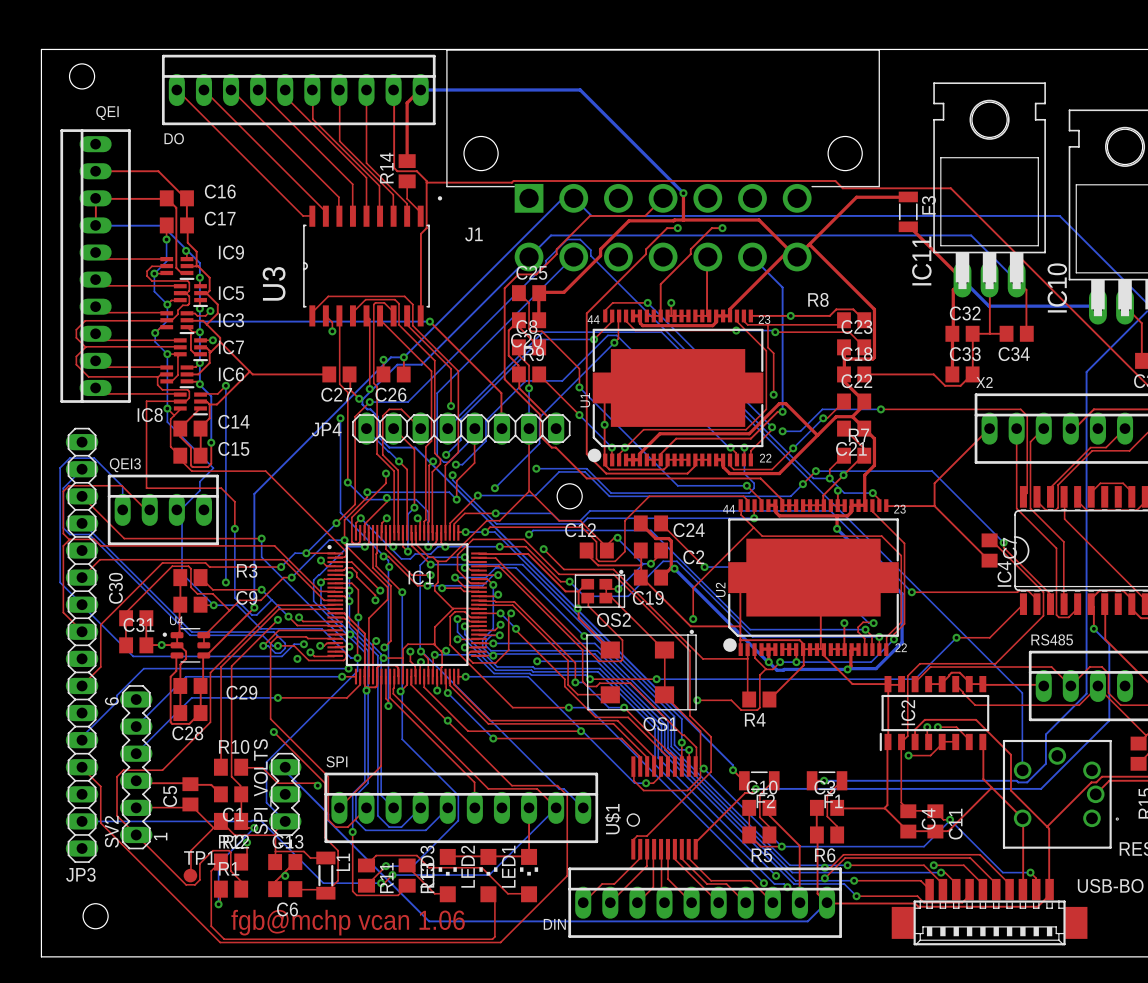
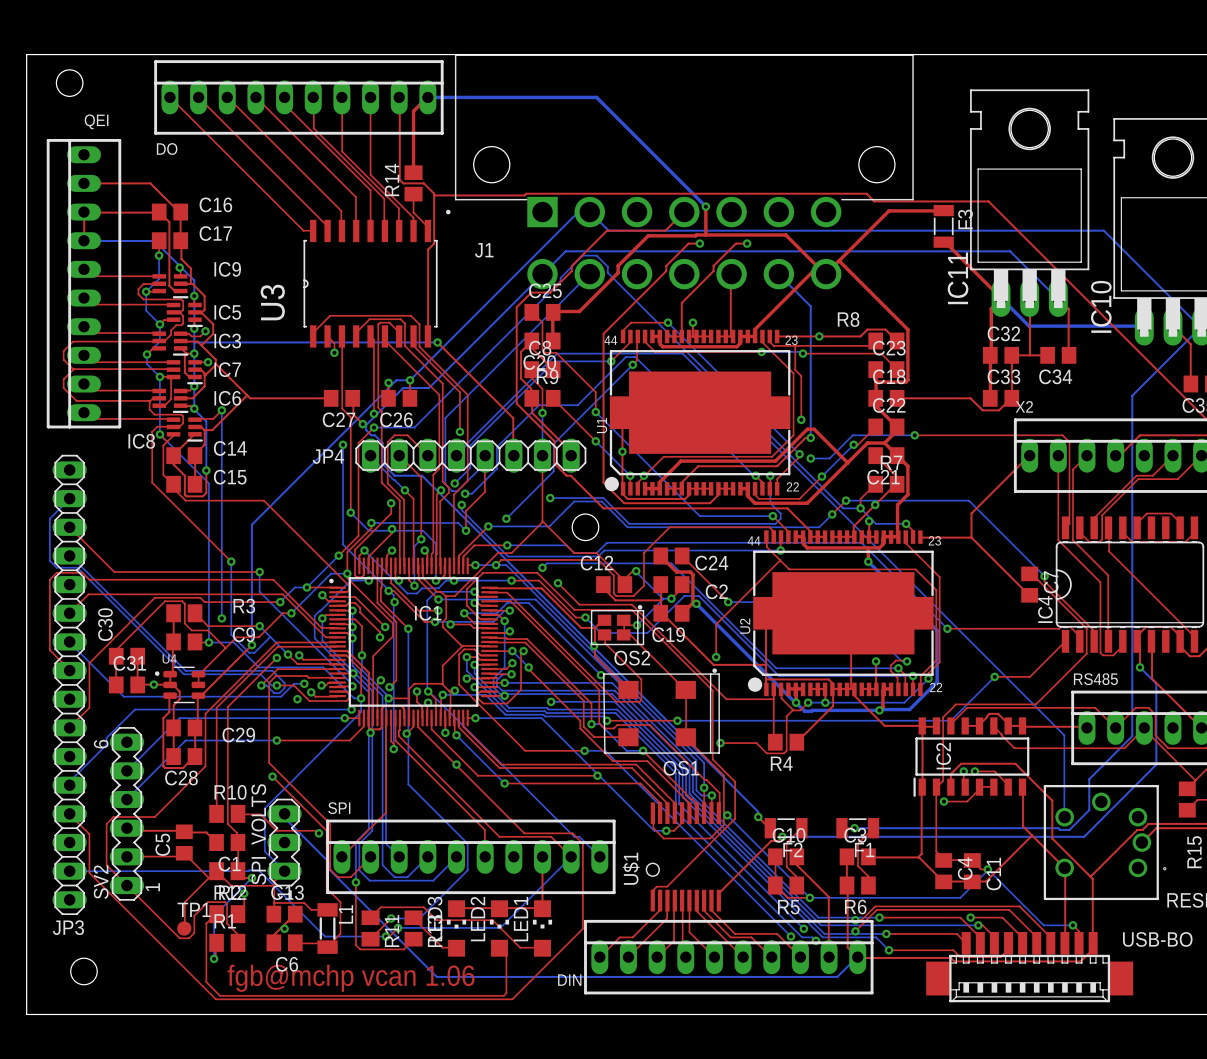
top track: (164, 401) (146, 401) (146, 488) (221, 488) (234, 501) (234, 528) -> (157, 426) (152, 431) (152, 482) (231, 561)
bottom track: (167, 408) (167, 422) (213, 468) (199, 481) (199, 490) (181, 509) (176, 509) (182, 509) (182, 573) (213, 605) -> (159, 434) (208, 483) (208, 642)
bottom track: (122, 509) (122, 486) (94, 458) (69, 458) (60, 467) (60, 582) (82, 604) -> none
top track: (149, 509) (145, 509) (121, 485) (69, 485) (63, 491) (63, 533) (69, 539) -> none
QEI3: (163, 509) -> none

